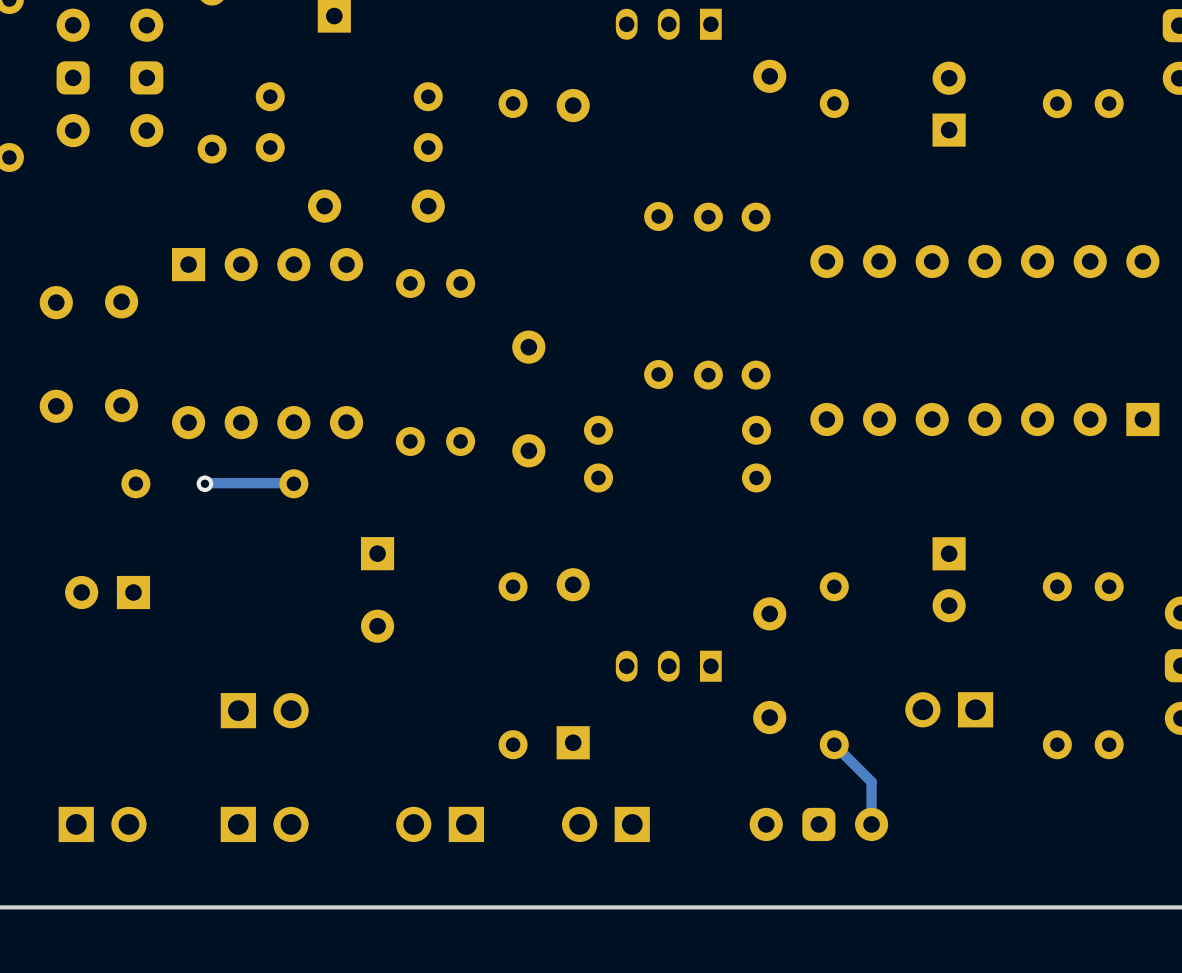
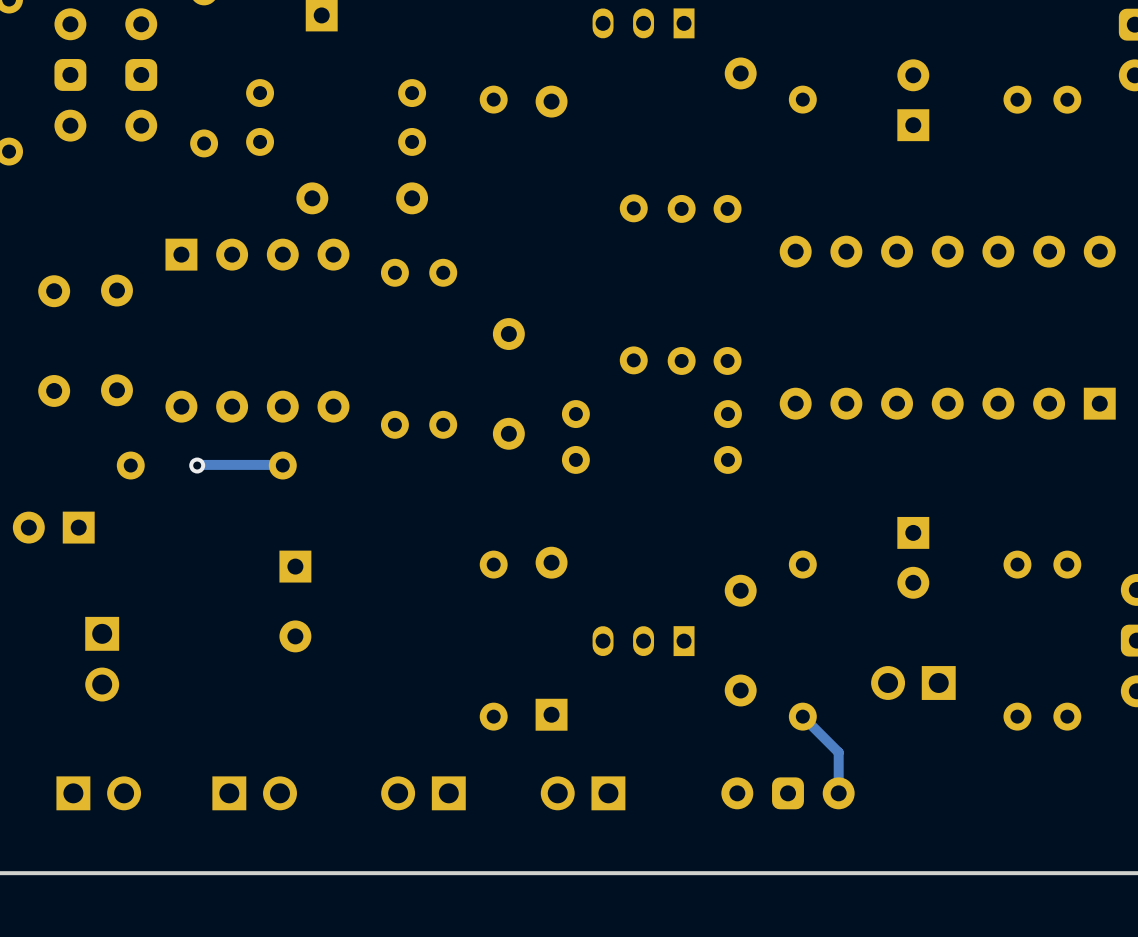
part position: (377, 589) -> (295, 601)
part position: (107, 592) -> (53, 527)
part: none -> (102, 659)
part: (264, 710) -> none

